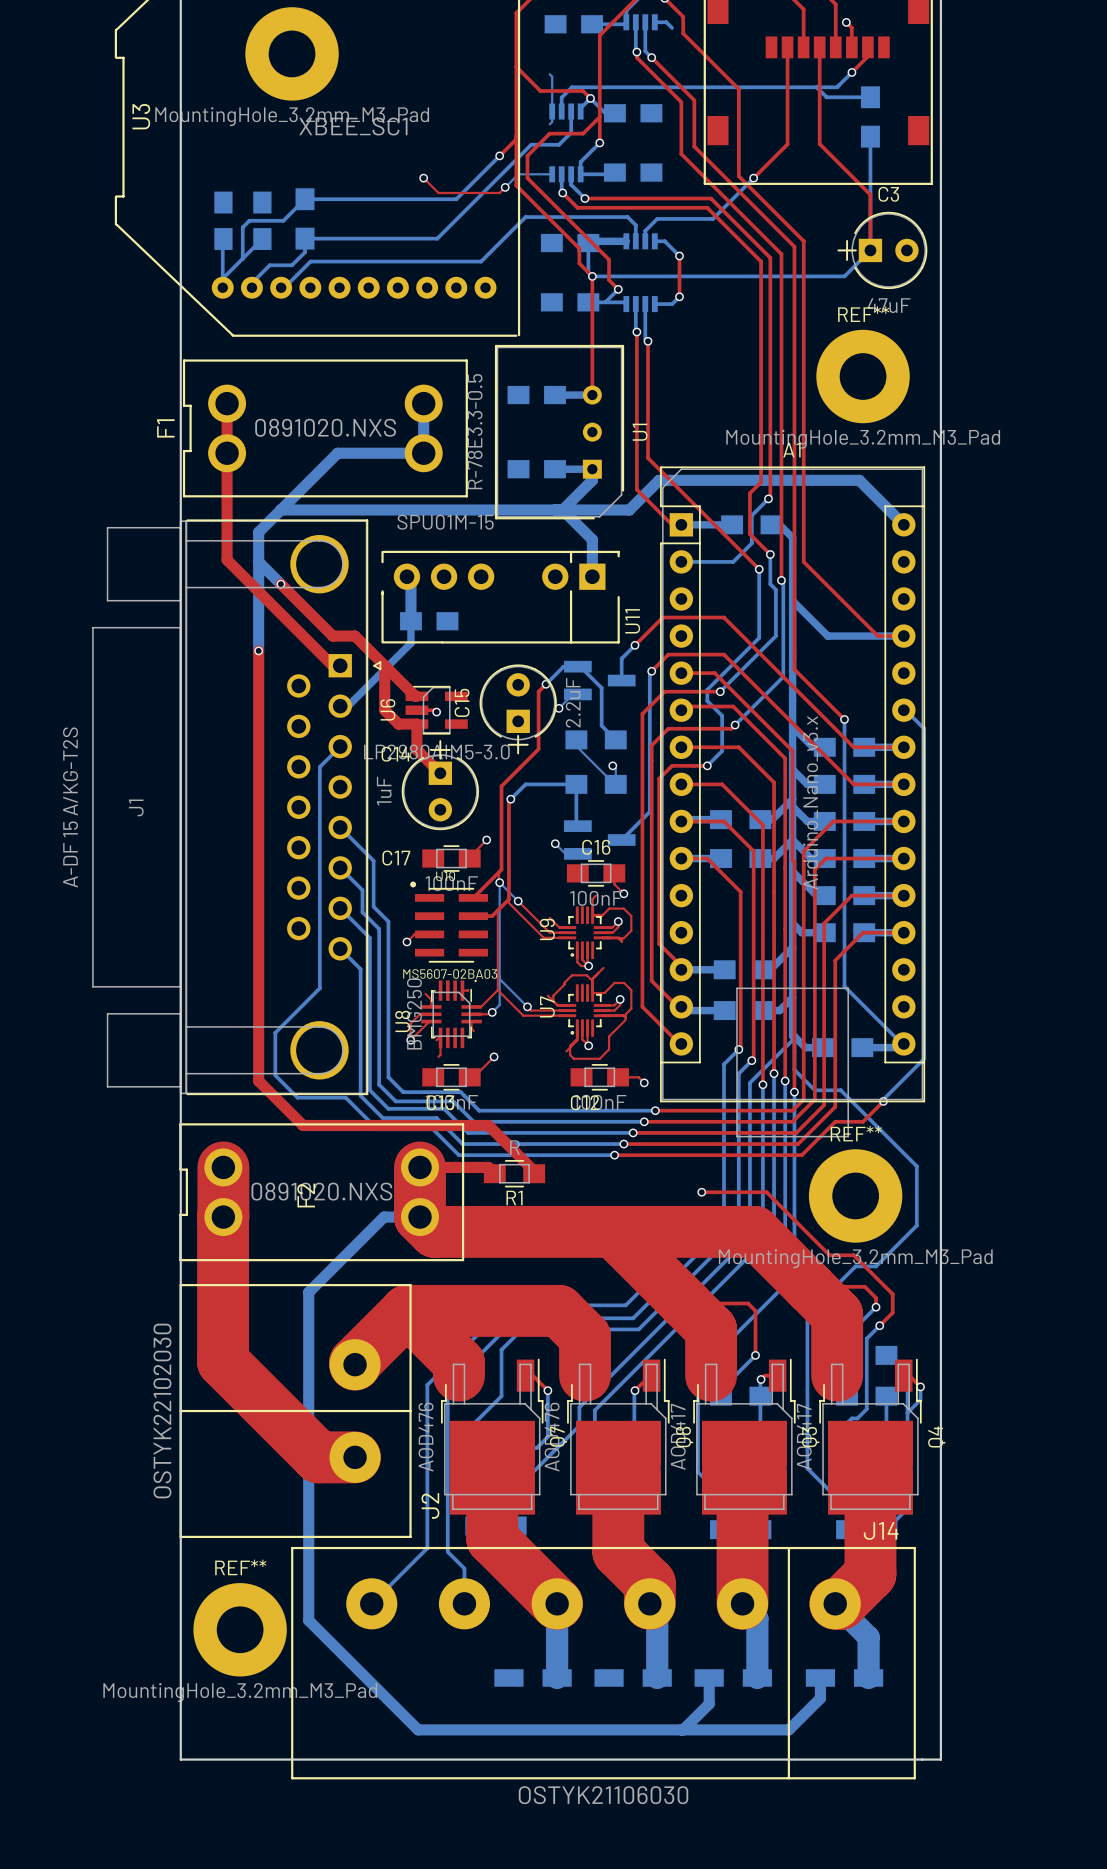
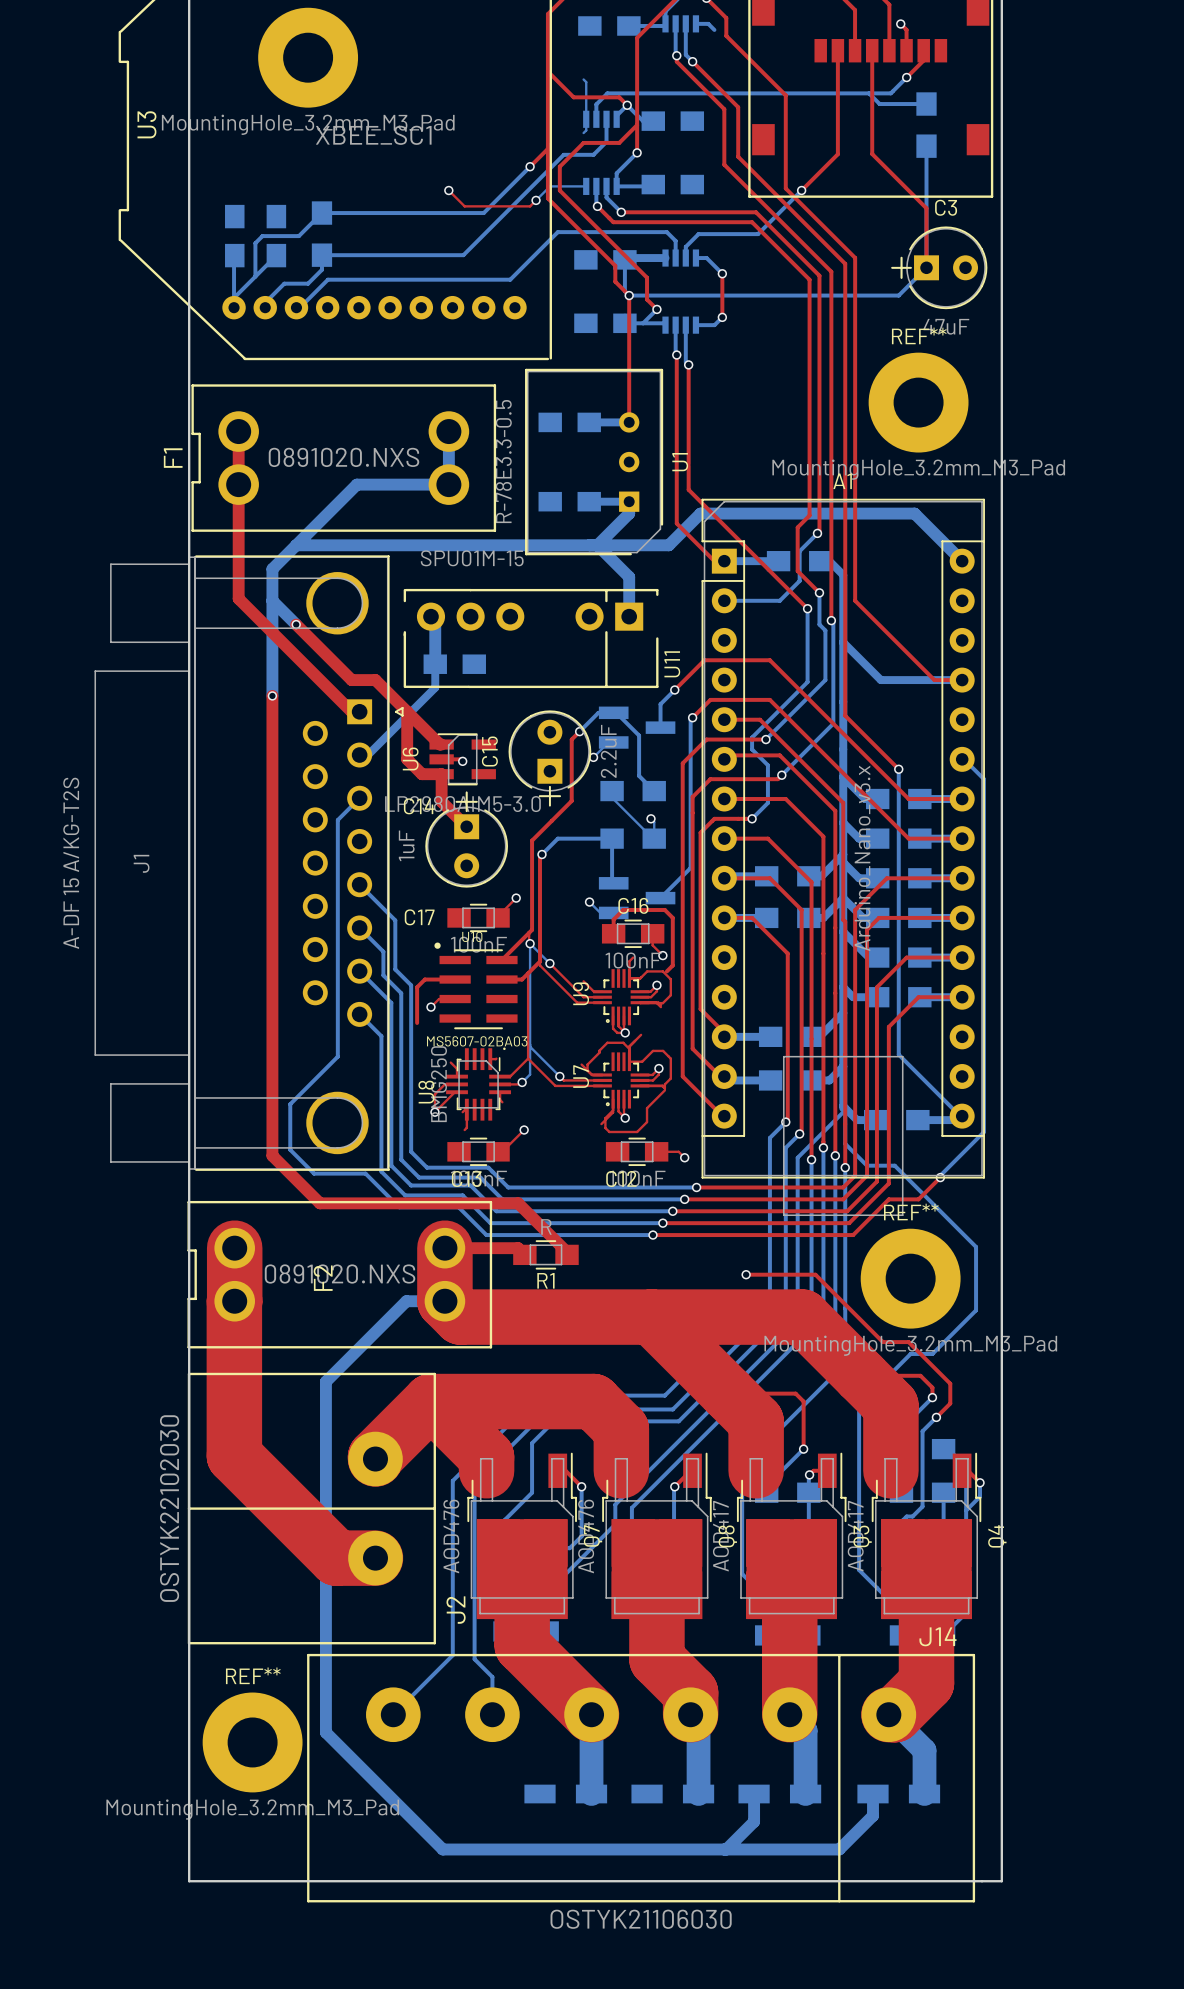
top track: none -> (613, 933) (613, 919) (623, 910) (664, 910) (672, 917) (672, 965) (666, 971)
top track: none -> (455, 979) (424, 979) (417, 987) (417, 1022)

